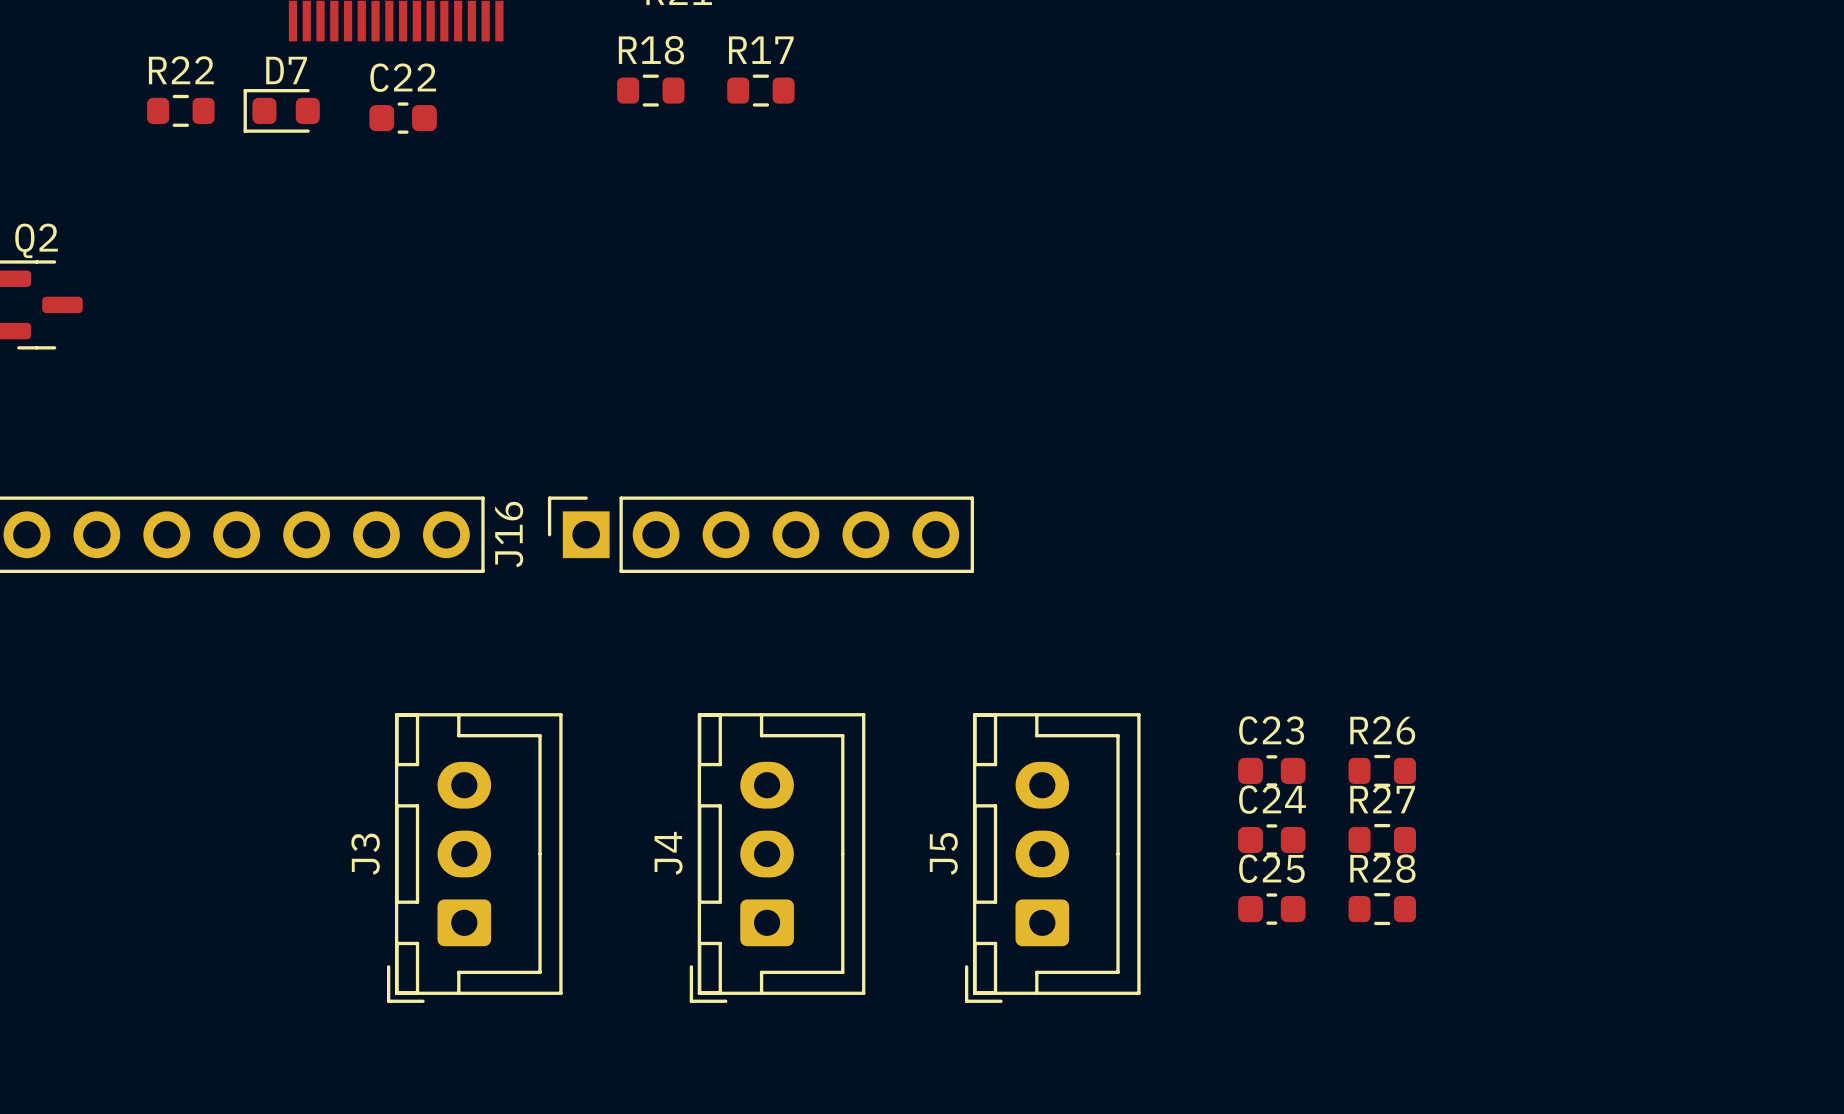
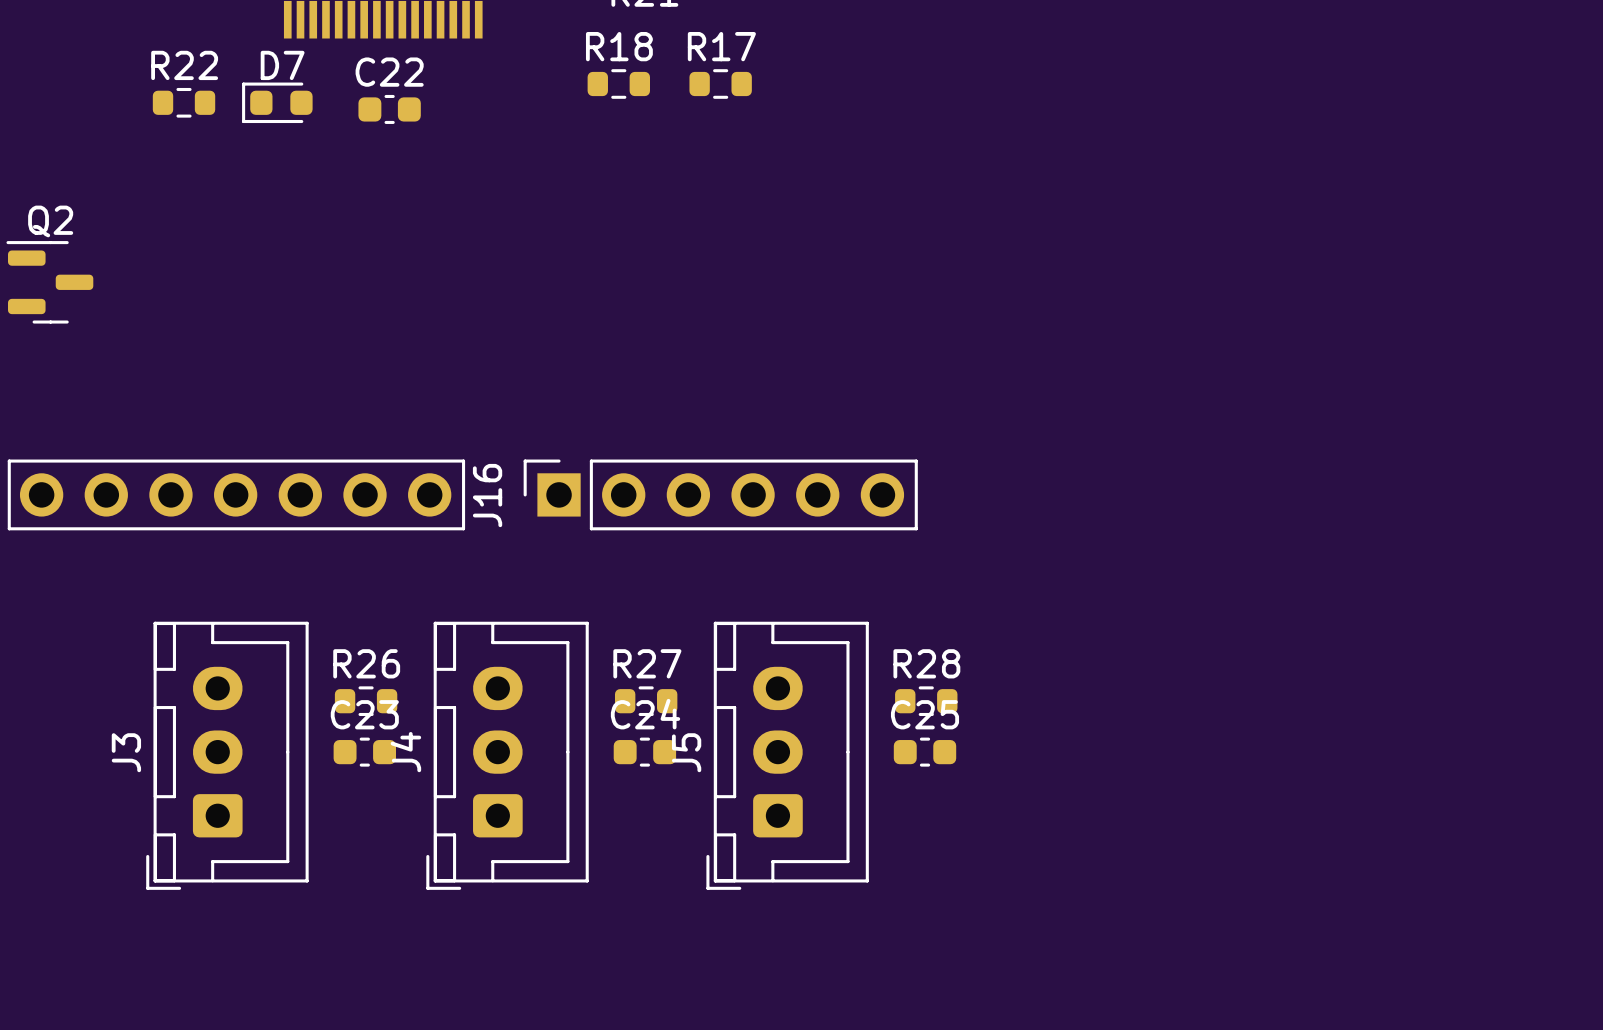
C23 position: (1271, 770) -> (364, 752)
R26 position: (1382, 770) -> (366, 701)
C24 position: (1271, 839) -> (644, 752)
R27 position: (1382, 839) -> (646, 701)
J3 position: (474, 858) -> (227, 755)
J4 position: (777, 858) -> (507, 755)
J5 position: (1052, 858) -> (787, 755)
C25 position: (1271, 909) -> (925, 752)
R28 position: (1382, 909) -> (926, 701)

